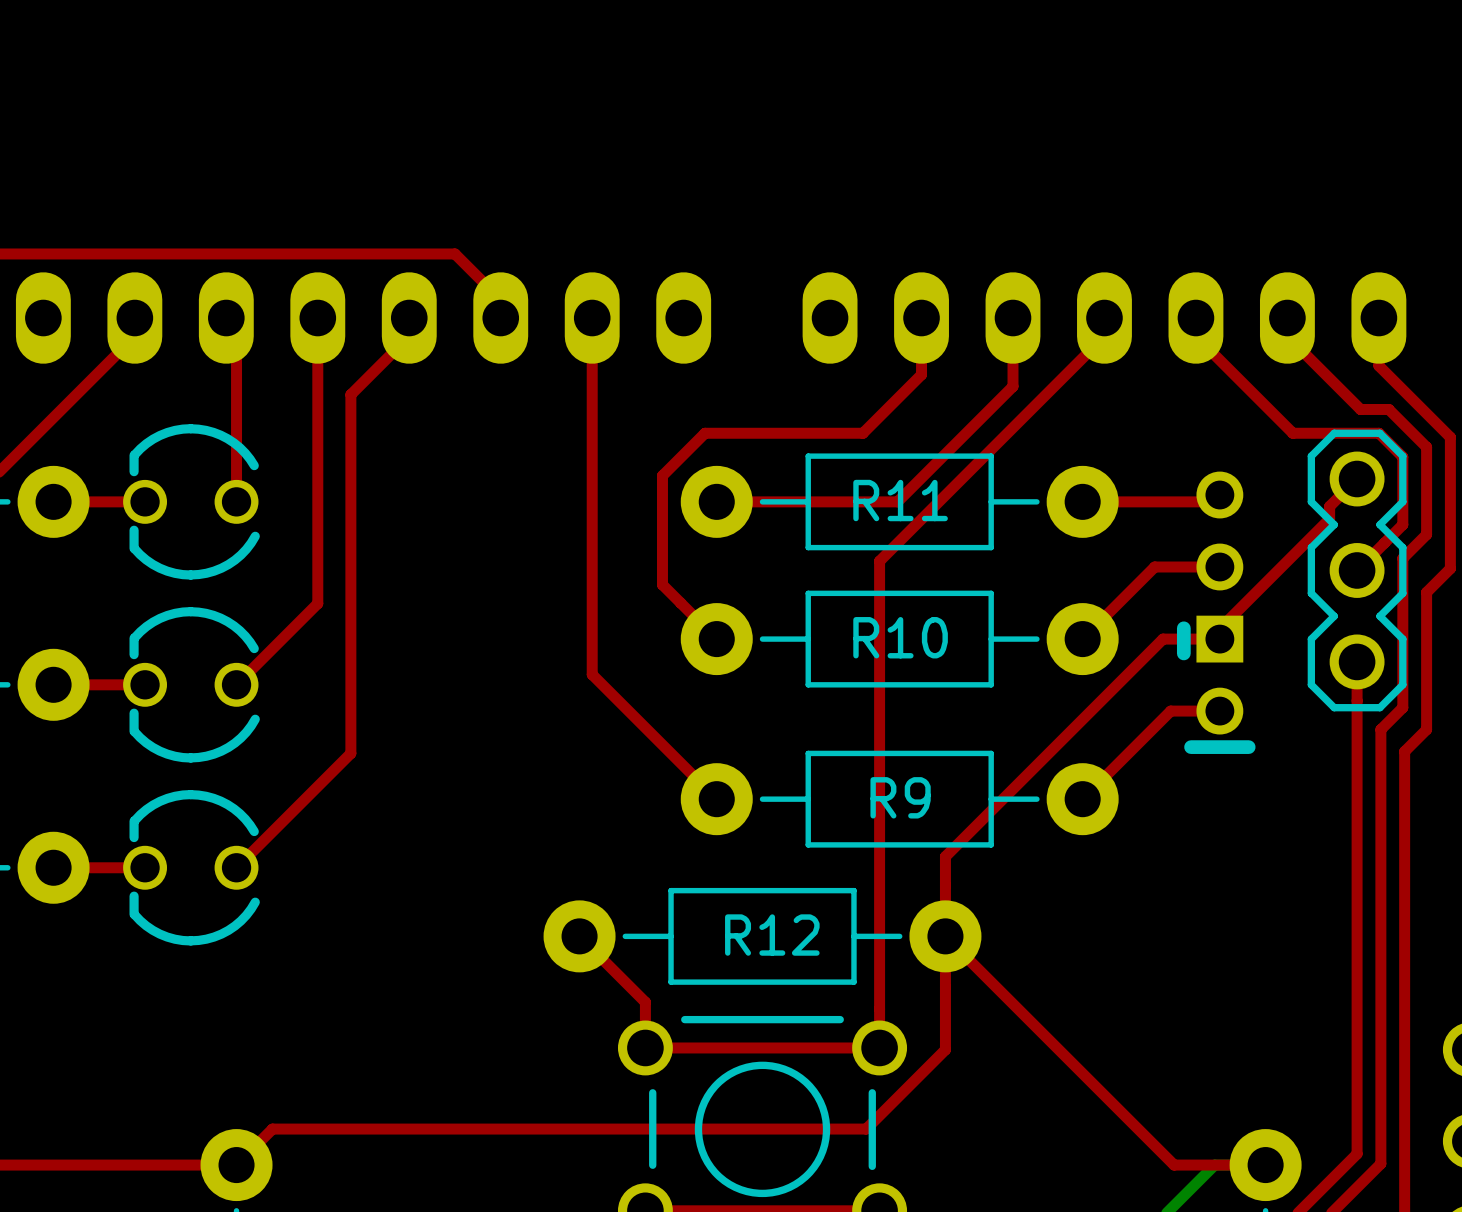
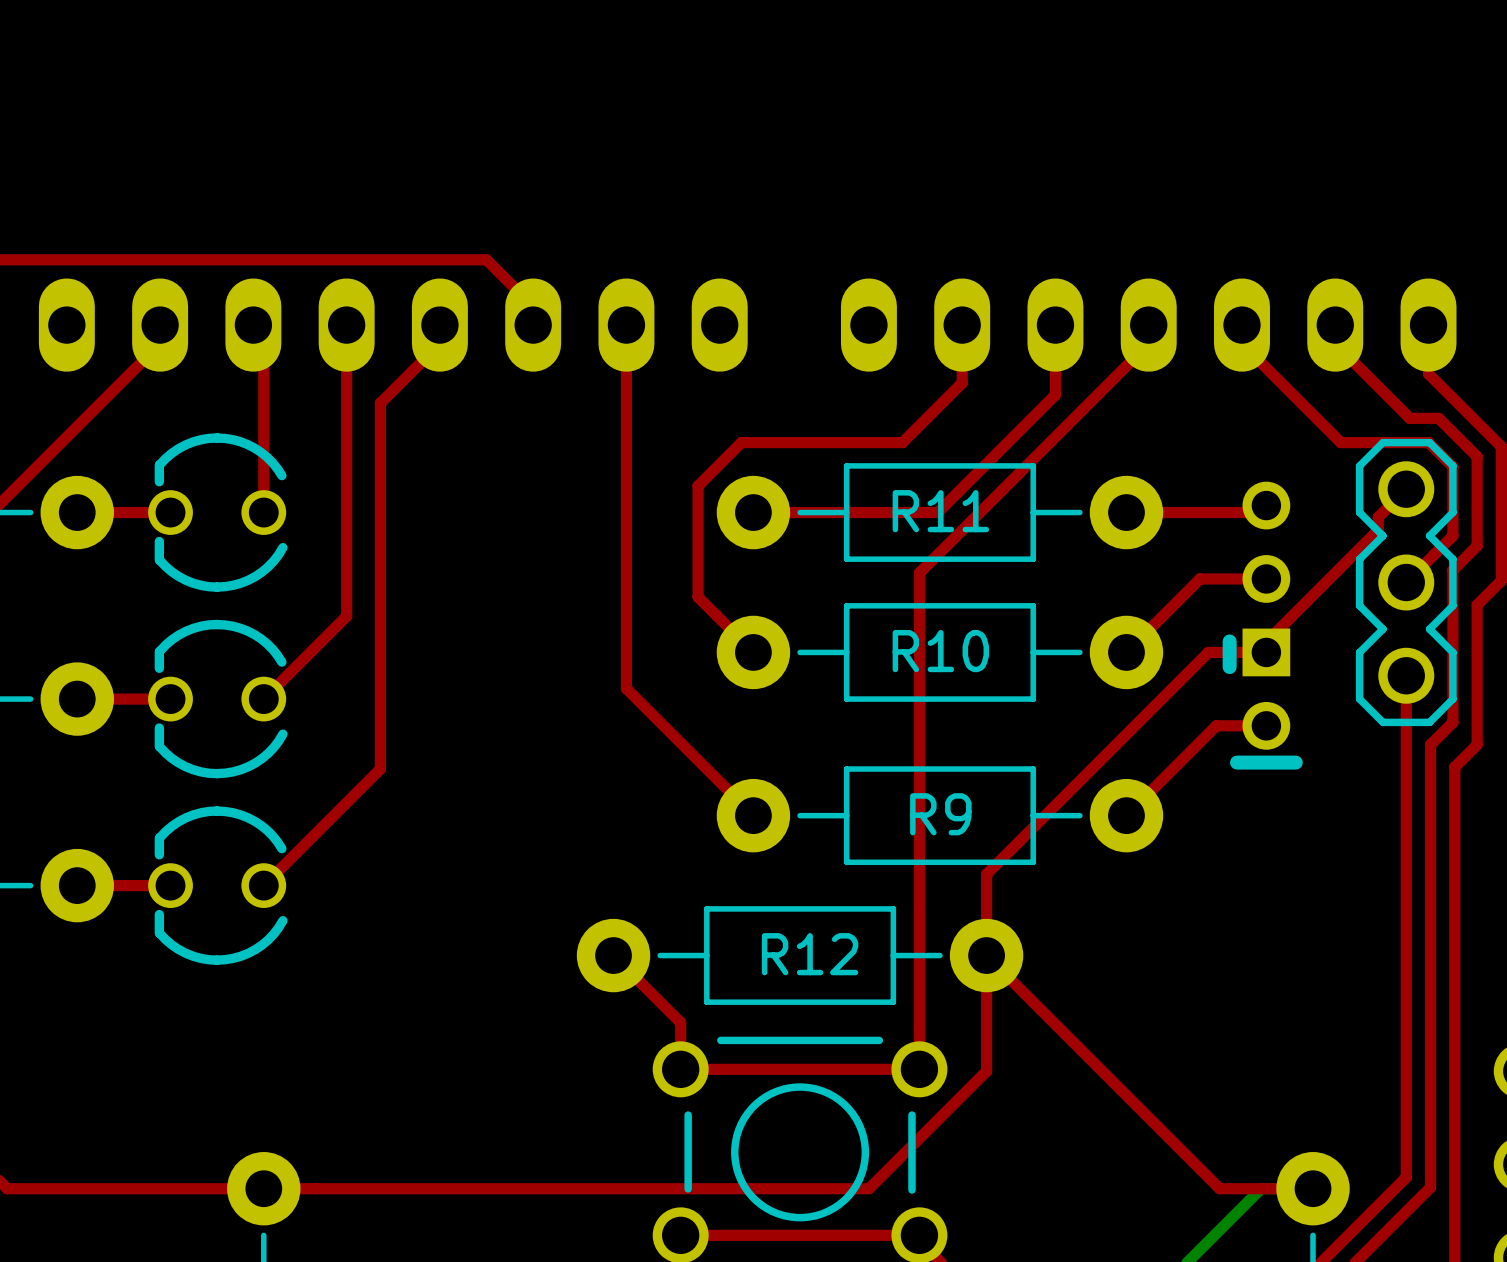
top track: (866, 1129) (272, 1129) (236, 1165) -> (905, 1152) (869, 1188) (263, 1188)

